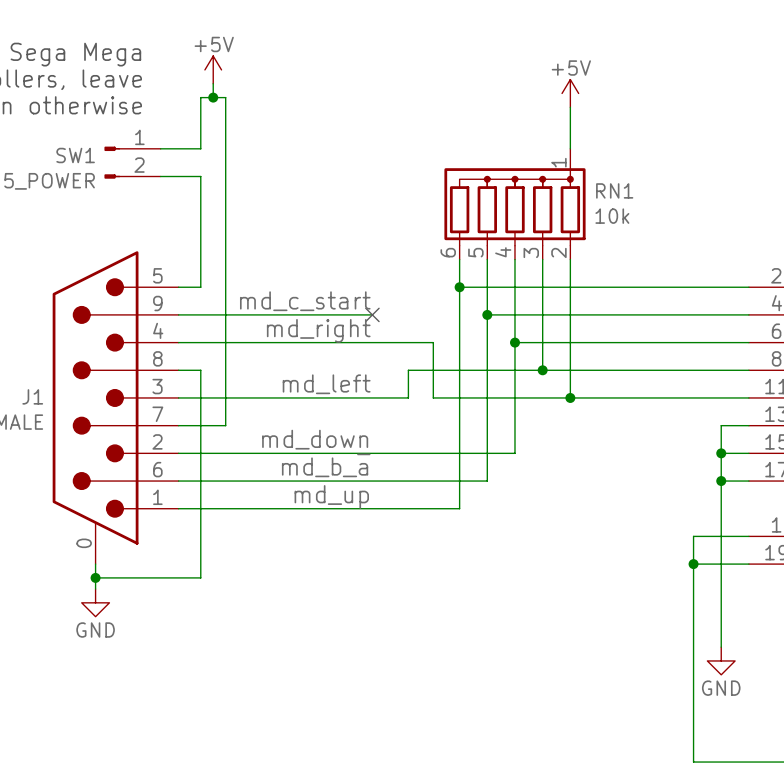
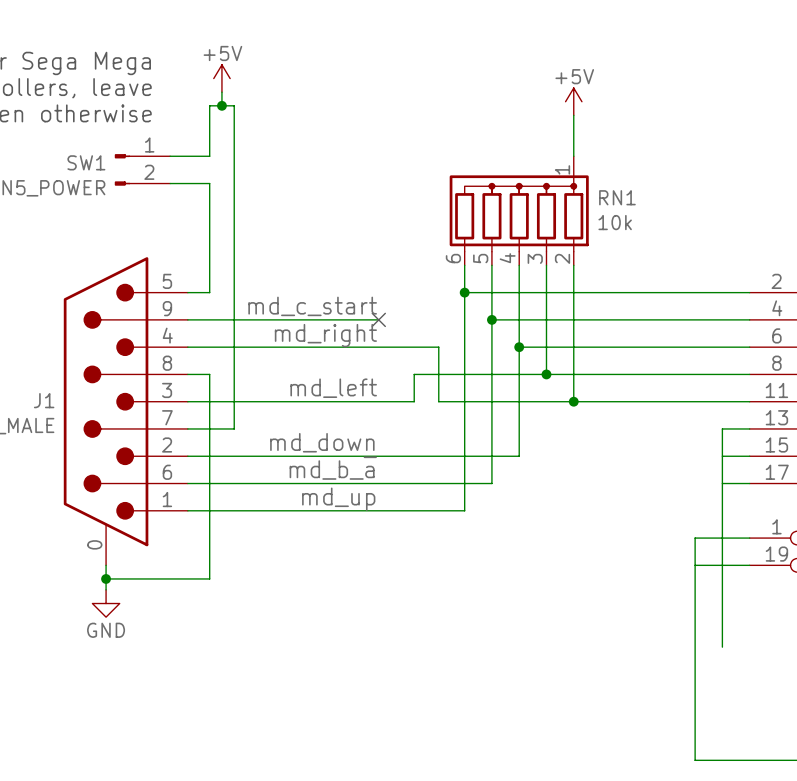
junction: (721, 453) -> none
junction: (721, 481) -> none
junction: (693, 564) -> none
power symbol: GND (721, 660) -> none

